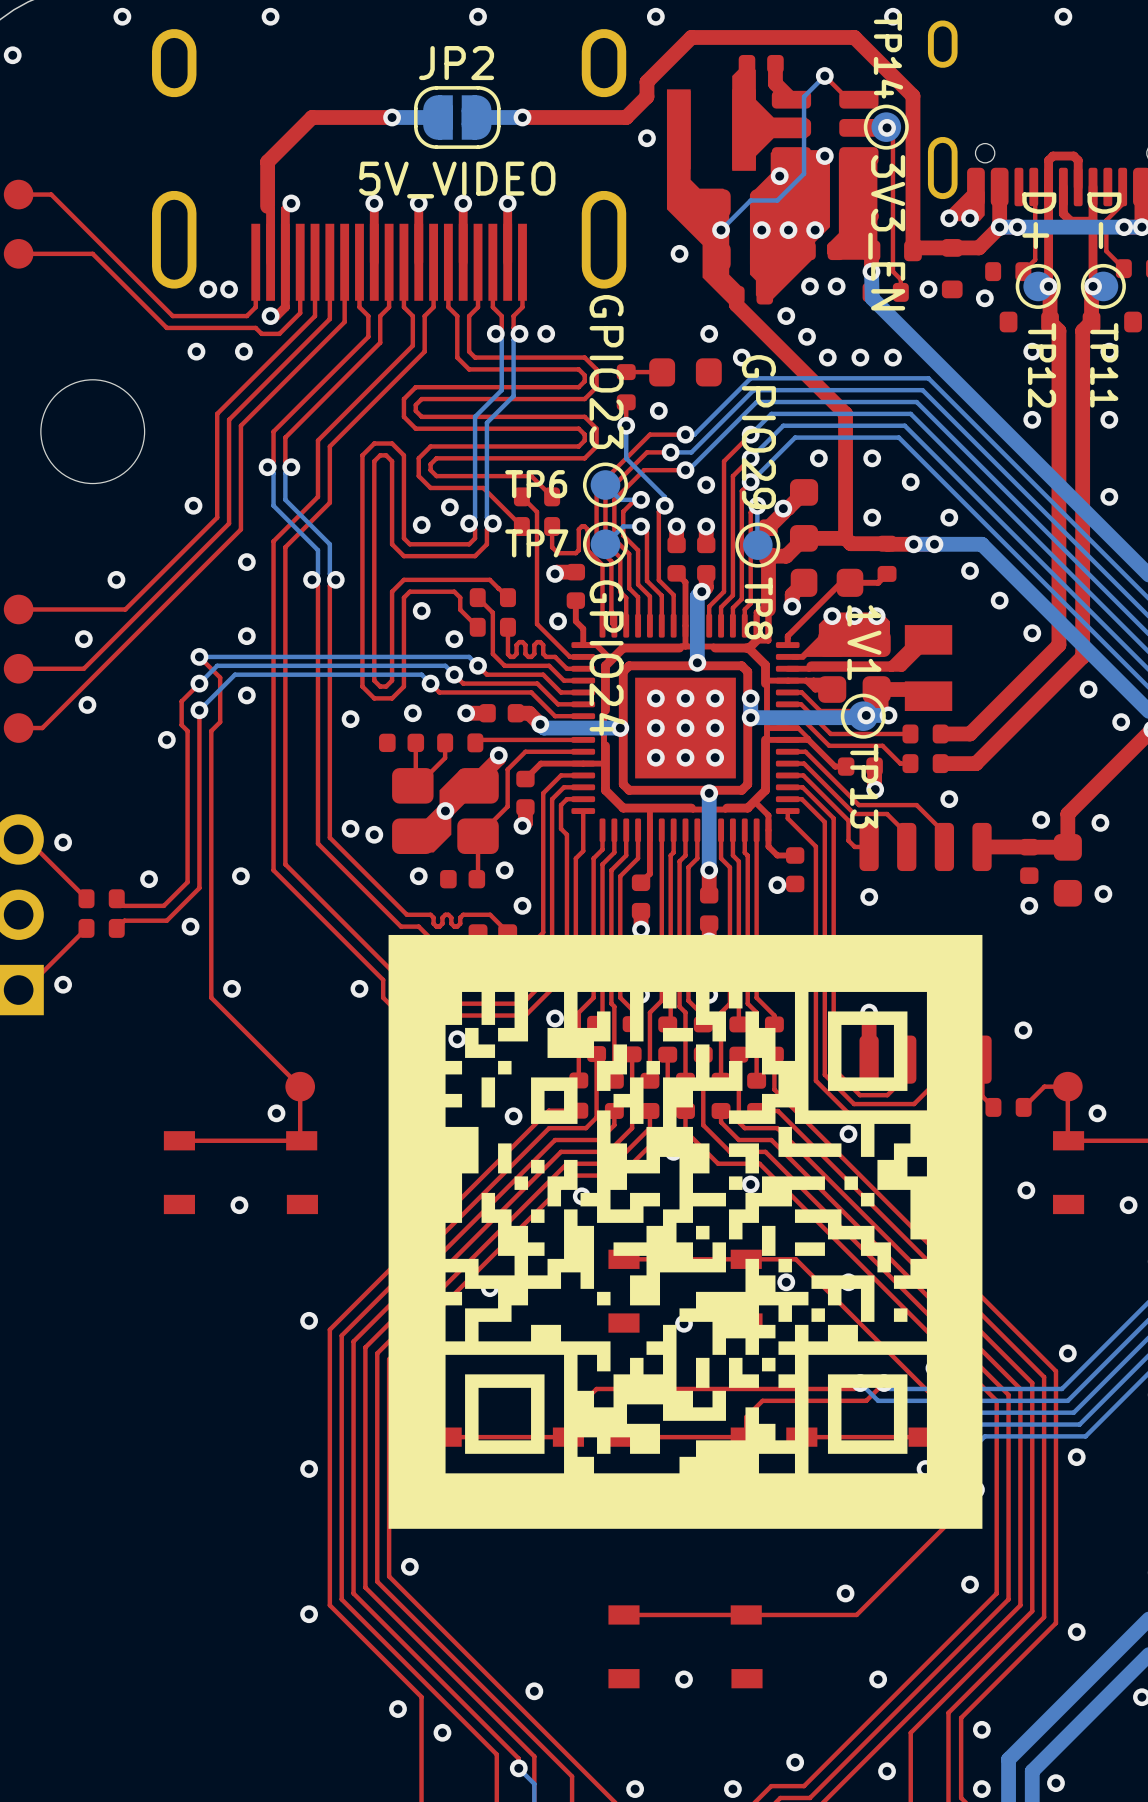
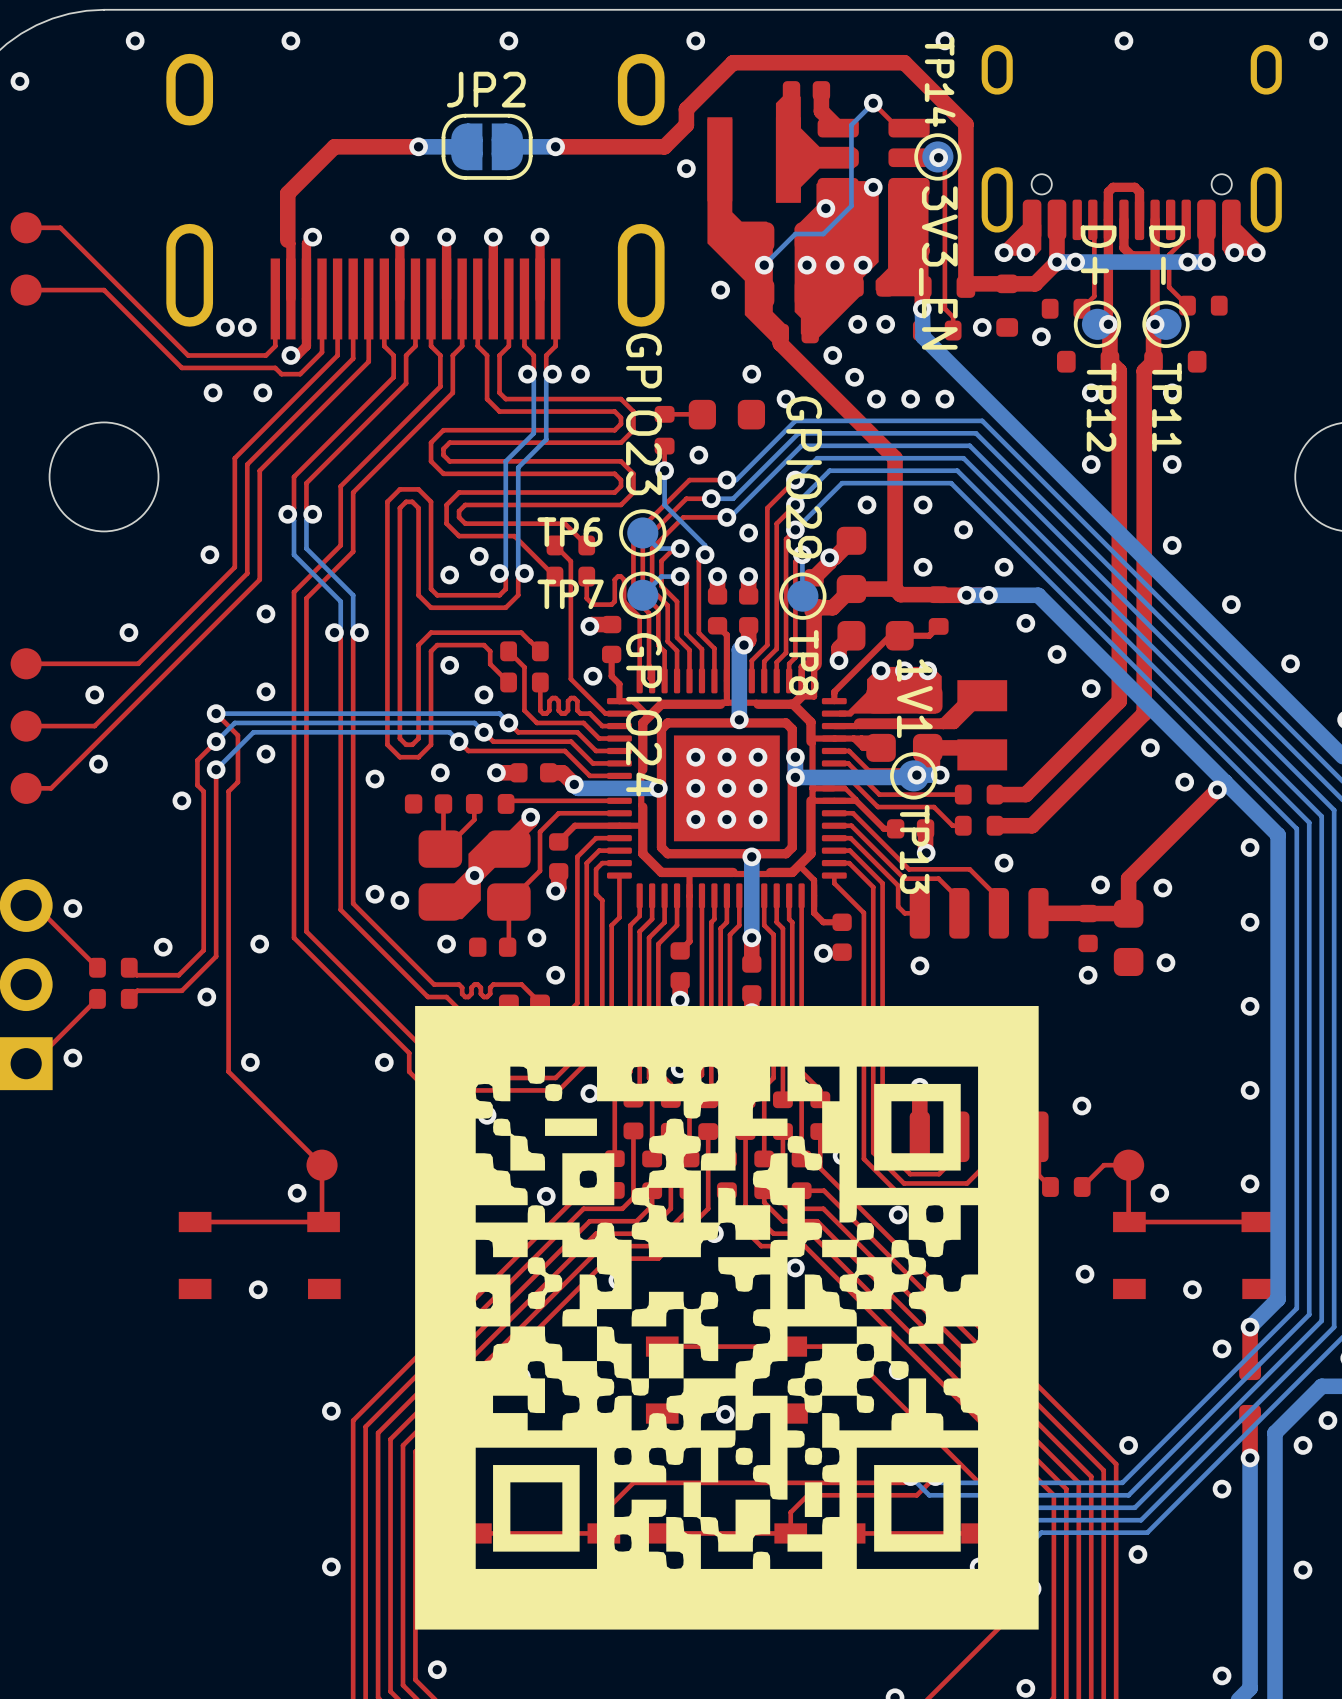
text: 5V_VIDEO (457, 180) -> none
drawing shape: [388, 934, 983, 1529] -> [415, 1005, 1039, 1630]

